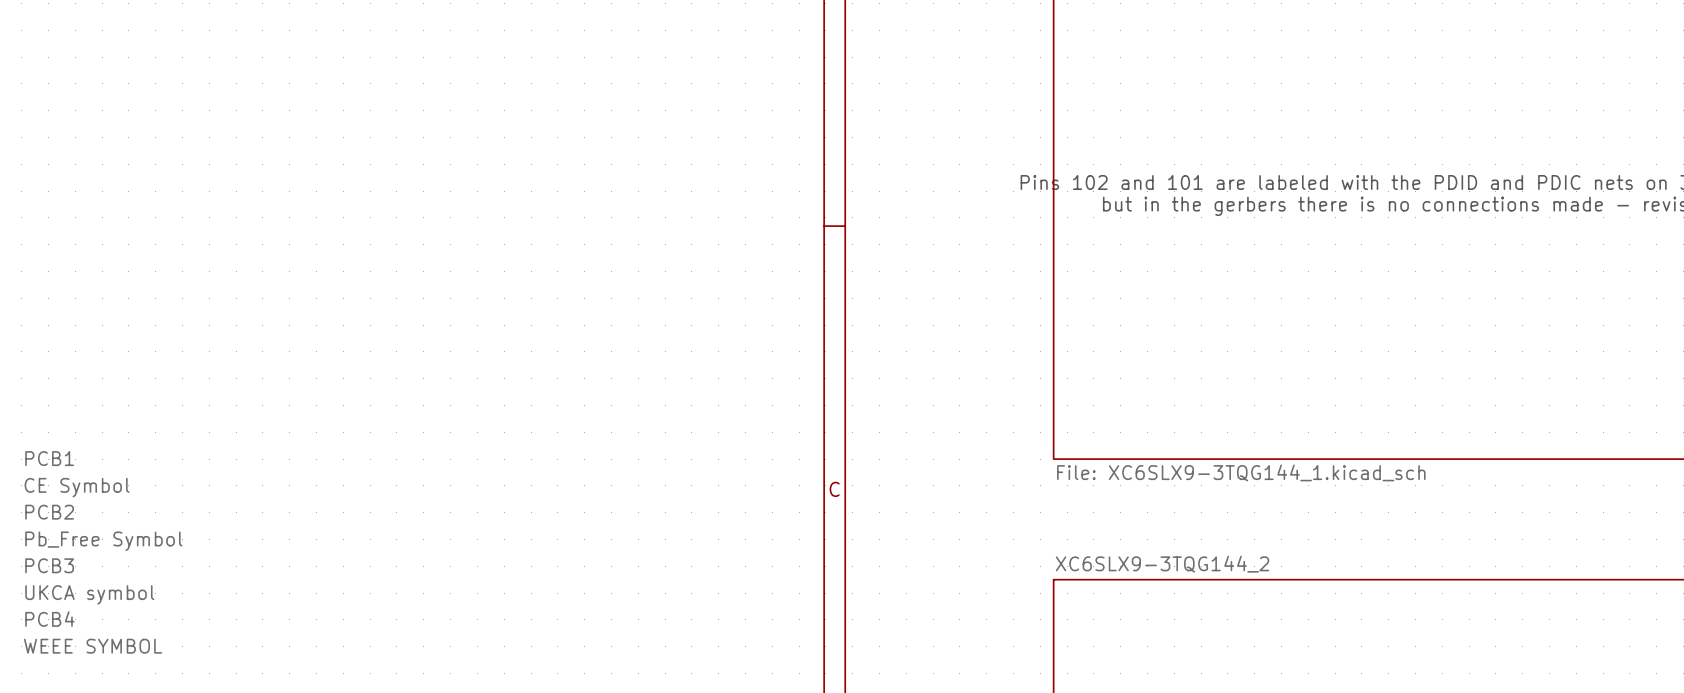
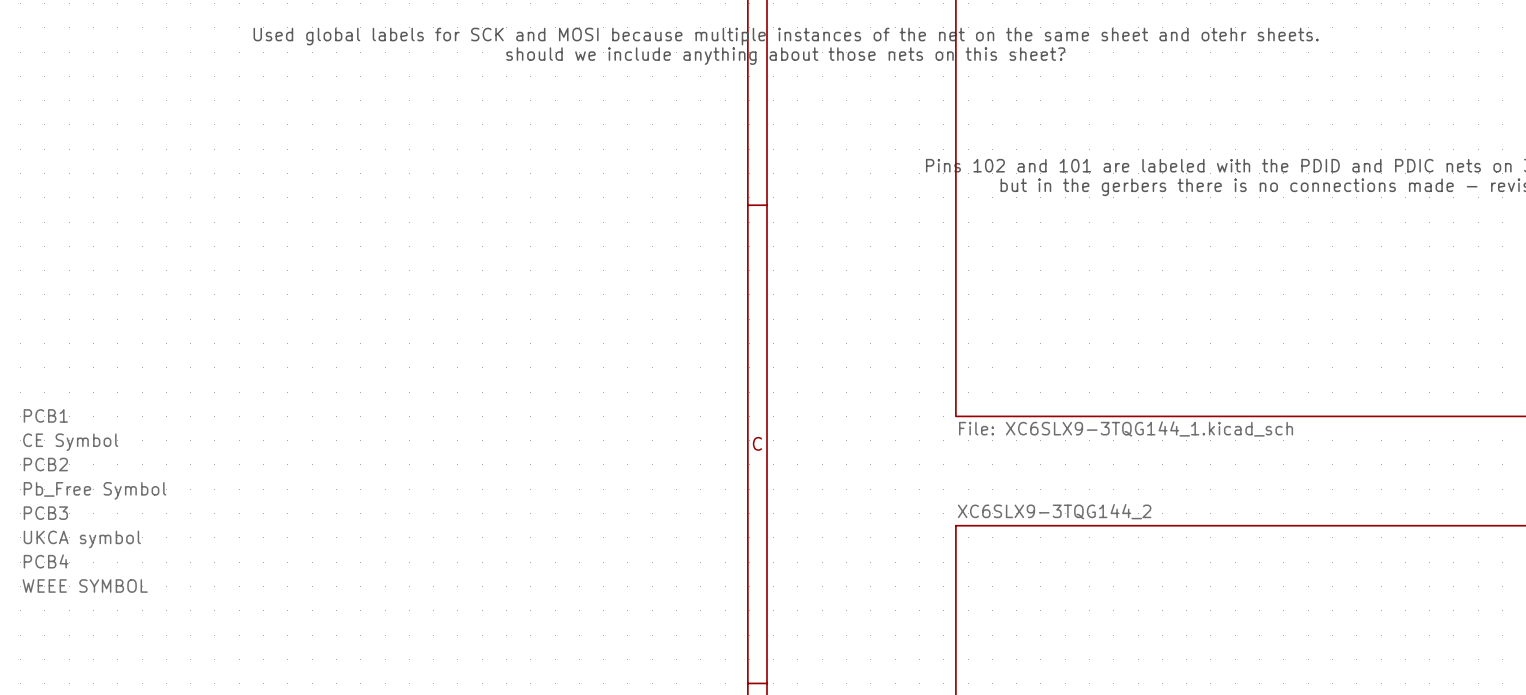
text: none -> Used global labels for SCK and MOSI because multiple instances of the net on the same sheet and otehr sheets. (786, 36)
text: none -> should we include anything about those nets on this sheet? (785, 56)

